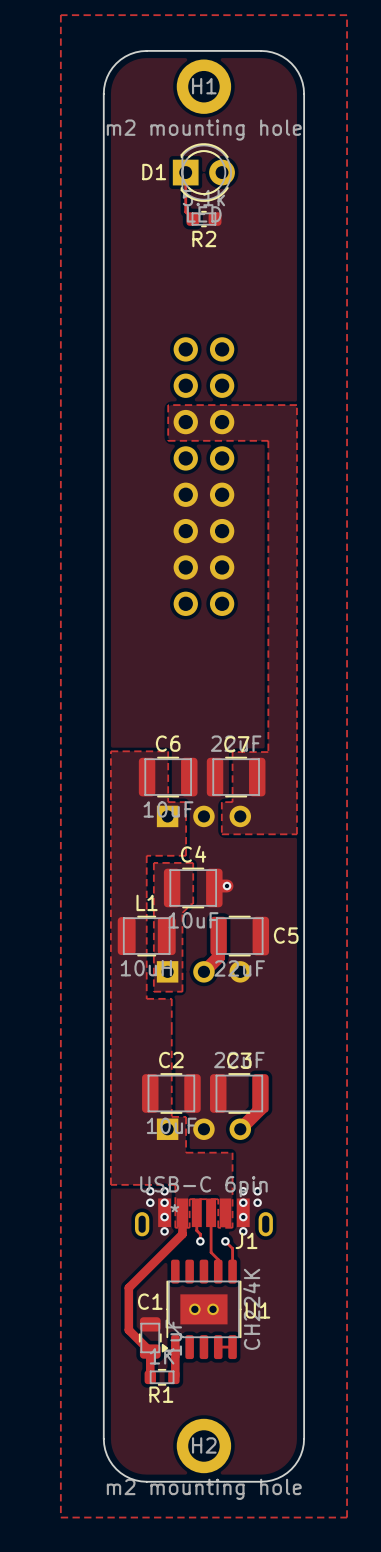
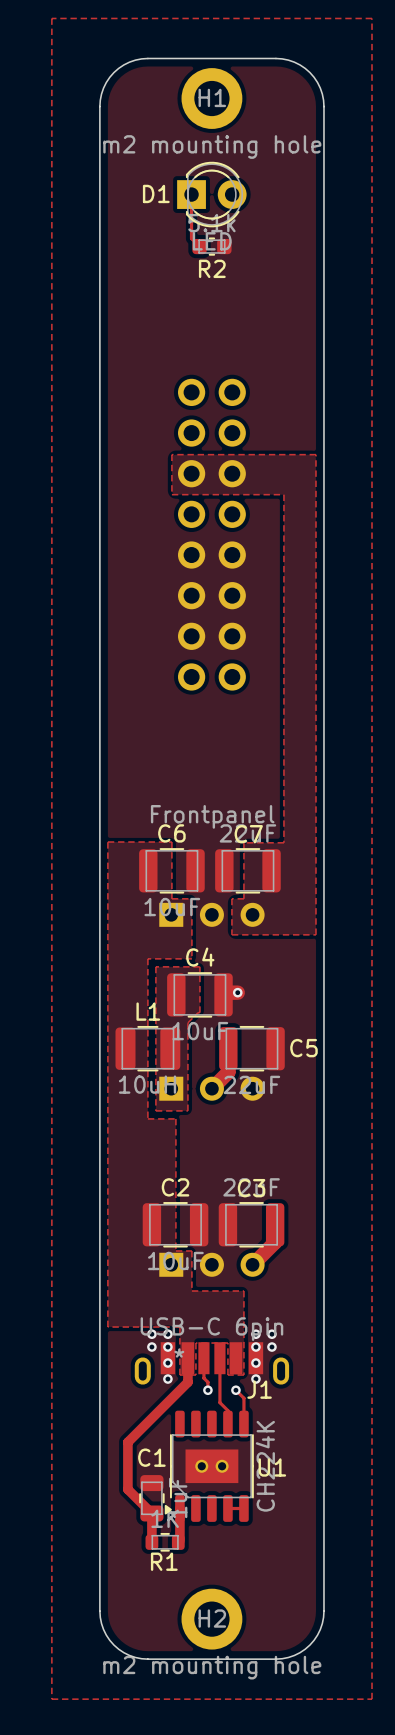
drawing: none -> [150, 805, 275, 829]

